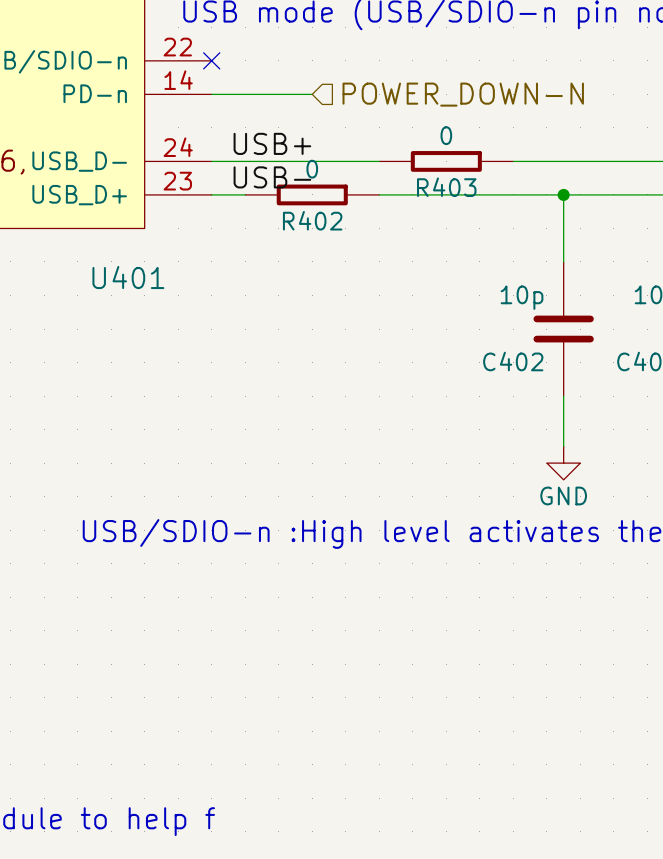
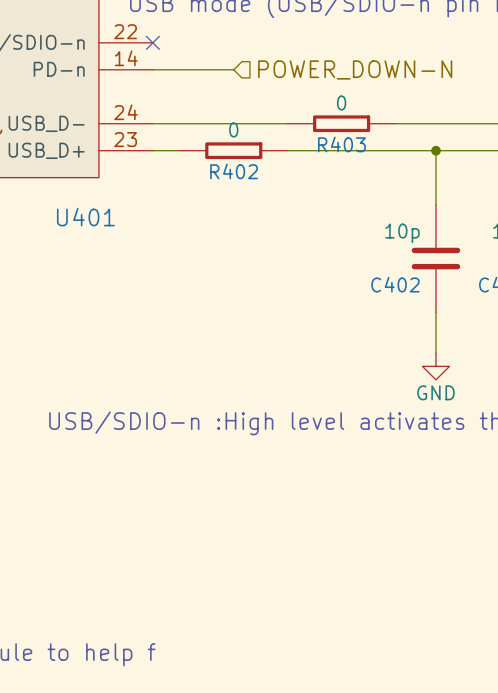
label: USB+ (272, 143) -> none
label: USB- (272, 177) -> none

